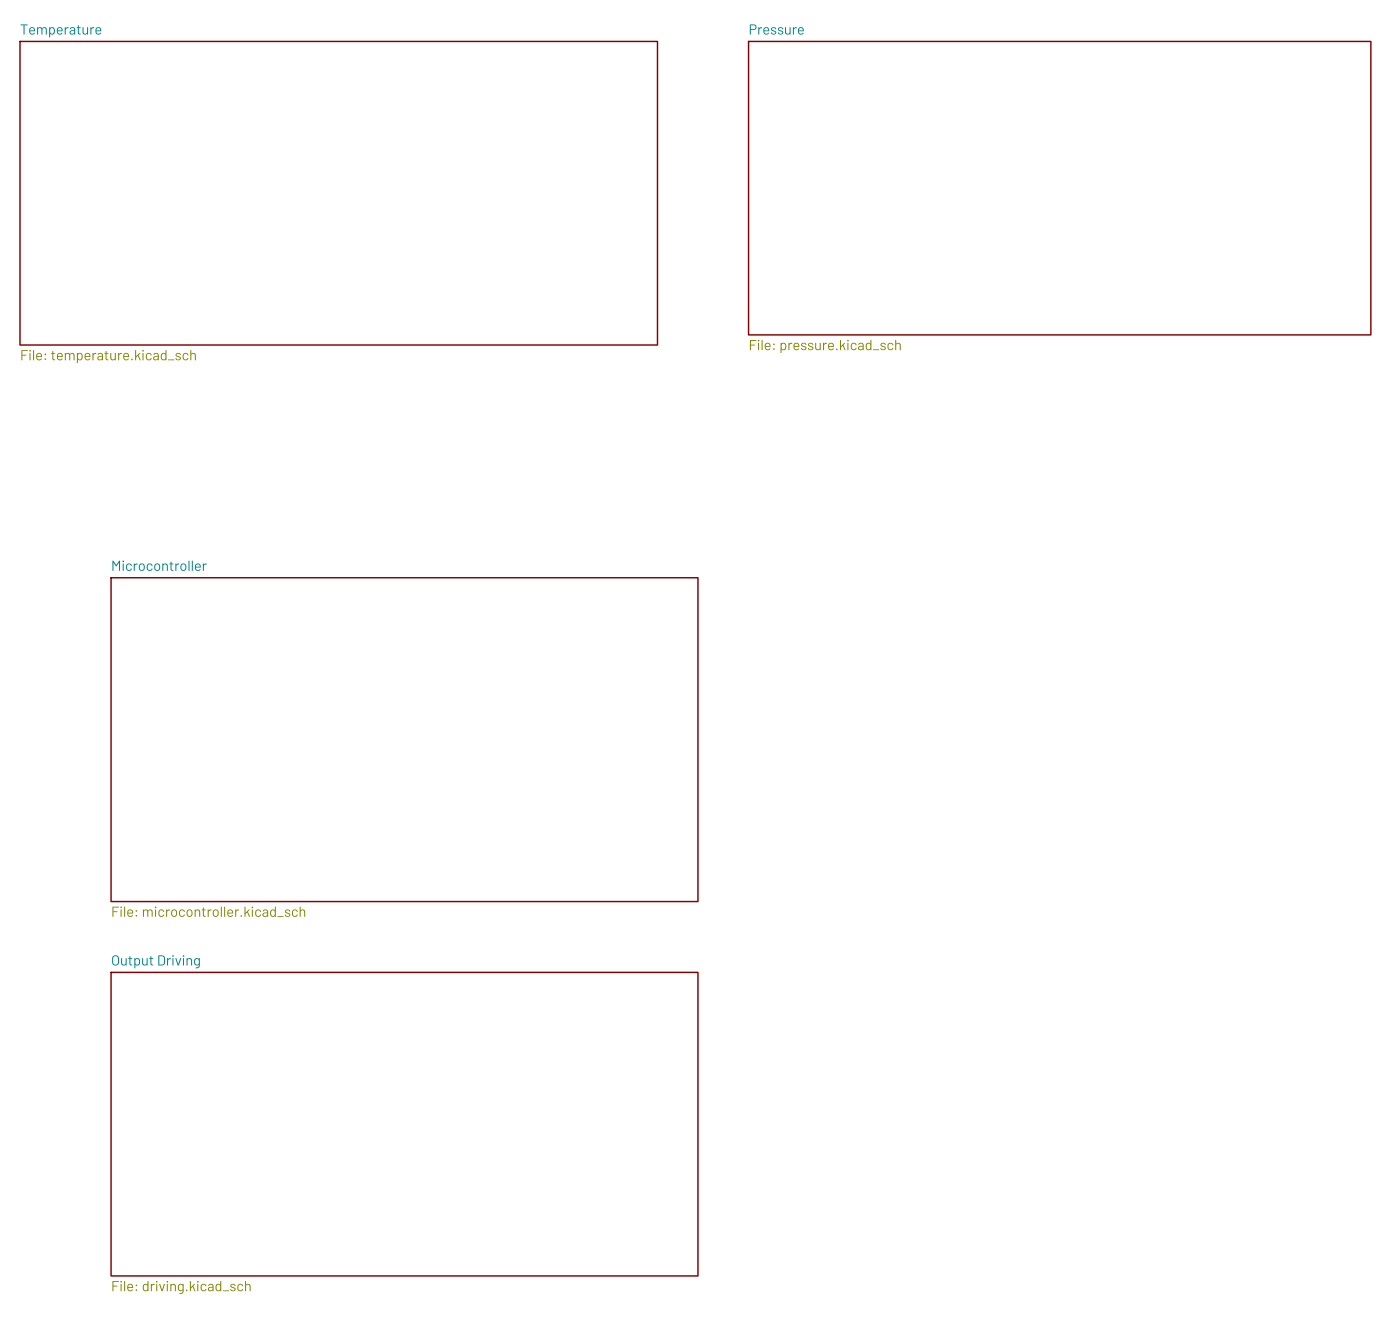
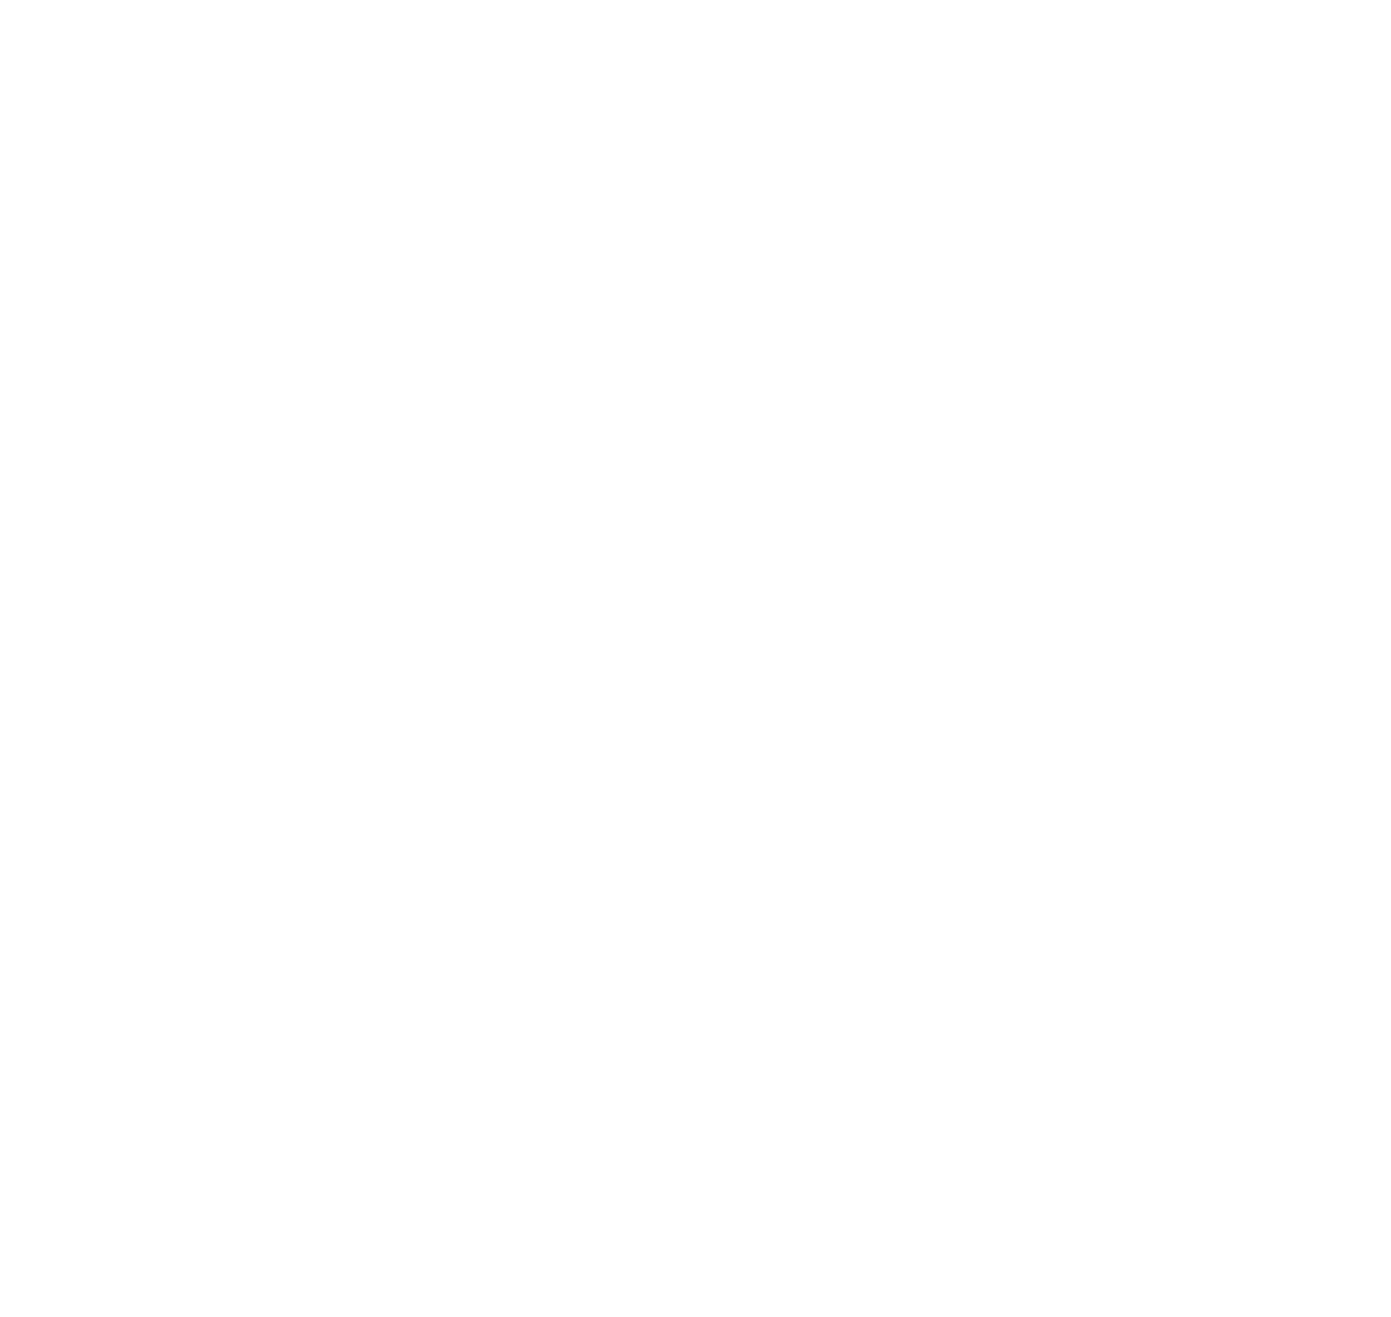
sheet Pressure: File: pressure.kicad_sch (1059, 188) -> none
sheet Temperature: File: temperature.kicad_sch (338, 193) -> none
sheet Microcontroller: File: microcontroller.kicad_sch (404, 739) -> none
sheet Output Driving: File: driving.kicad_sch (404, 1124) -> none

